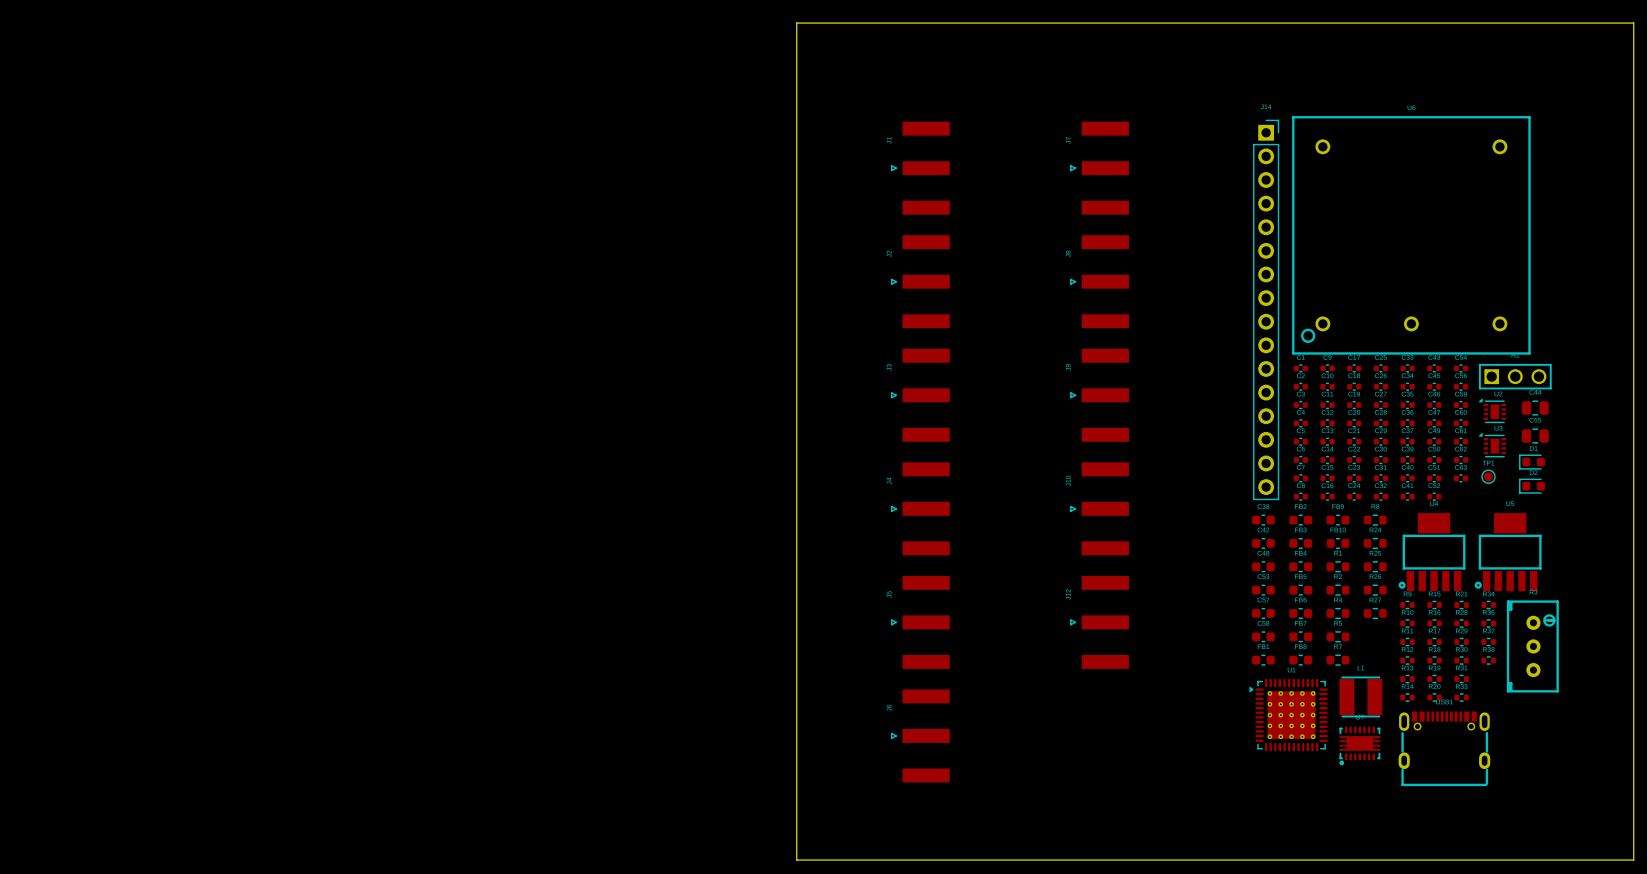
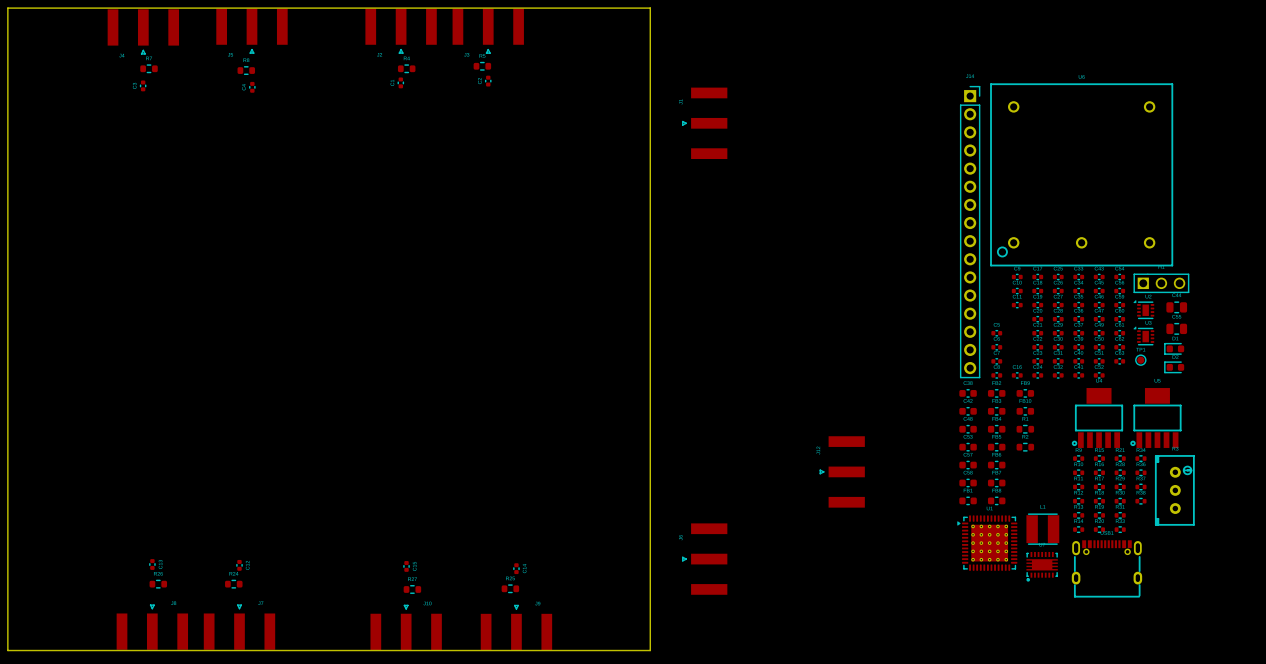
board edge: none -> (7, 8) (650, 8) (650, 650) (7, 650) (7, 8)
board edge: (796, 23) (1633, 23) (1633, 860) (796, 860) (796, 23) -> none
part rotation: 0° (1099, 168) -> 90° clockwise (239, 627)
part position: (1099, 168) -> (239, 627)
part rotation: 0° (920, 281) -> 90° counterclockwise (401, 31)
part position: (920, 281) -> (401, 31)
part rotation: 0° (1099, 281) -> 90° clockwise (152, 627)
part position: (1099, 281) -> (152, 627)
part rotation: 0° (1300, 368) -> 90° clockwise (400, 82)
part position: (1300, 368) -> (400, 82)
part rotation: 0° (1300, 386) -> 90° clockwise (488, 81)
part position: (1300, 386) -> (488, 81)
part rotation: 0° (920, 395) -> 90° counterclockwise (488, 31)
part position: (920, 395) -> (488, 31)
part rotation: 0° (1099, 395) -> 90° clockwise (516, 627)
part position: (1099, 395) -> (516, 627)
part rotation: 0° (1300, 405) -> 90° clockwise (143, 85)
part position: (1300, 405) -> (143, 85)
part rotation: 0° (1300, 423) -> 90° clockwise (252, 87)
part position: (1300, 423) -> (252, 87)
part rotation: 0° (1327, 423) -> 90° clockwise (239, 565)
part position: (1327, 423) -> (239, 565)
part rotation: 0° (1327, 441) -> 90° clockwise (152, 564)
part position: (1327, 441) -> (152, 564)
part rotation: 0° (1327, 460) -> 90° clockwise (516, 568)
part position: (1327, 460) -> (516, 568)
part rotation: 0° (1327, 478) -> 90° clockwise (406, 566)
part position: (1327, 478) -> (406, 566)
part rotation: 0° (920, 508) -> 90° counterclockwise (143, 31)
part position: (920, 508) -> (143, 31)
part rotation: 0° (1099, 508) -> 90° clockwise (406, 627)
part position: (1099, 508) -> (406, 627)
part position: (1375, 520) -> (246, 70)
part position: (1375, 543) -> (233, 584)
part position: (1375, 566) -> (510, 588)
part position: (1375, 590) -> (158, 584)
part position: (1338, 613) -> (406, 68)
part position: (1375, 613) -> (412, 589)
part rotation: 0° (920, 622) -> 90° counterclockwise (251, 31)
part position: (920, 622) -> (251, 31)
part position: (1338, 636) -> (482, 66)
part position: (1338, 660) -> (149, 68)

